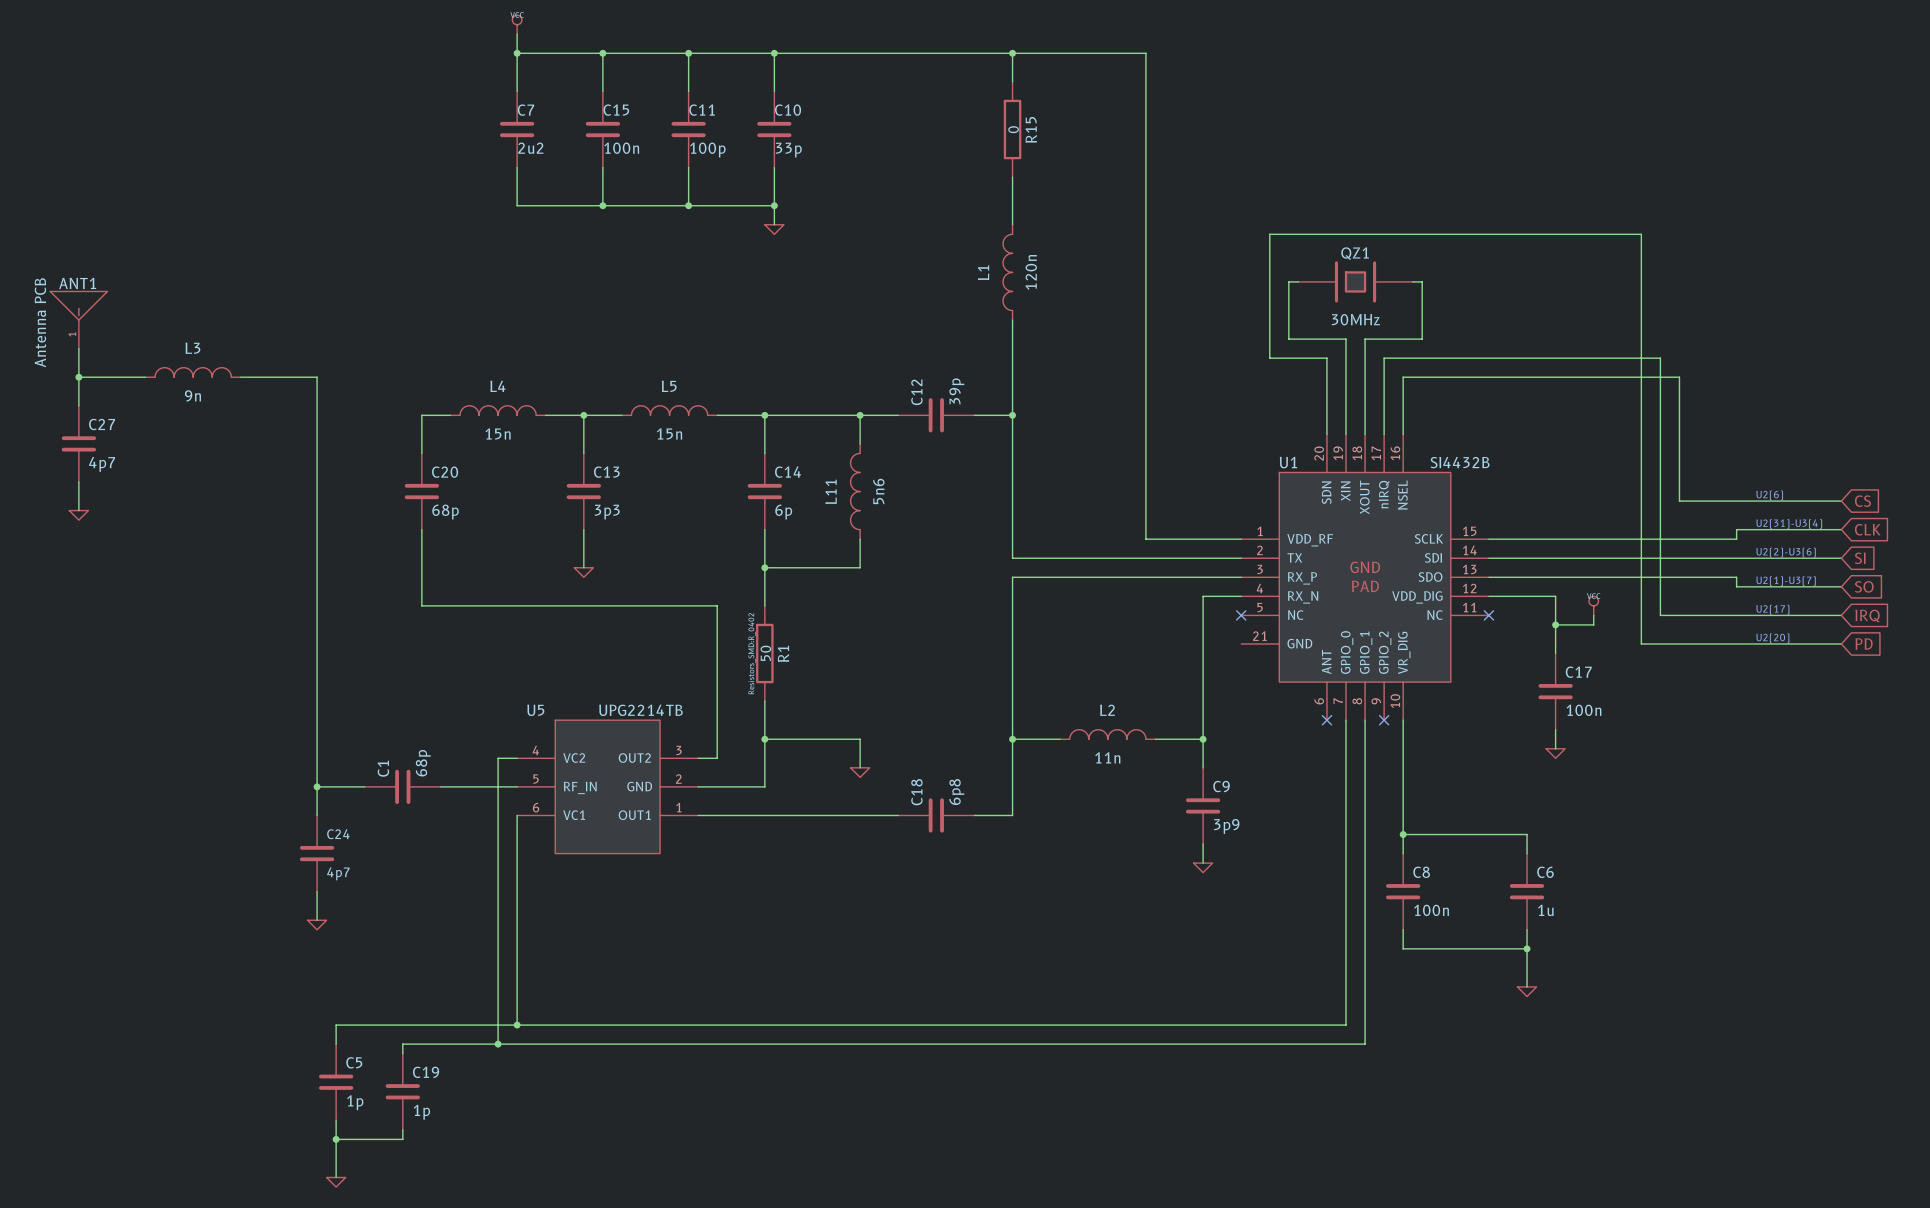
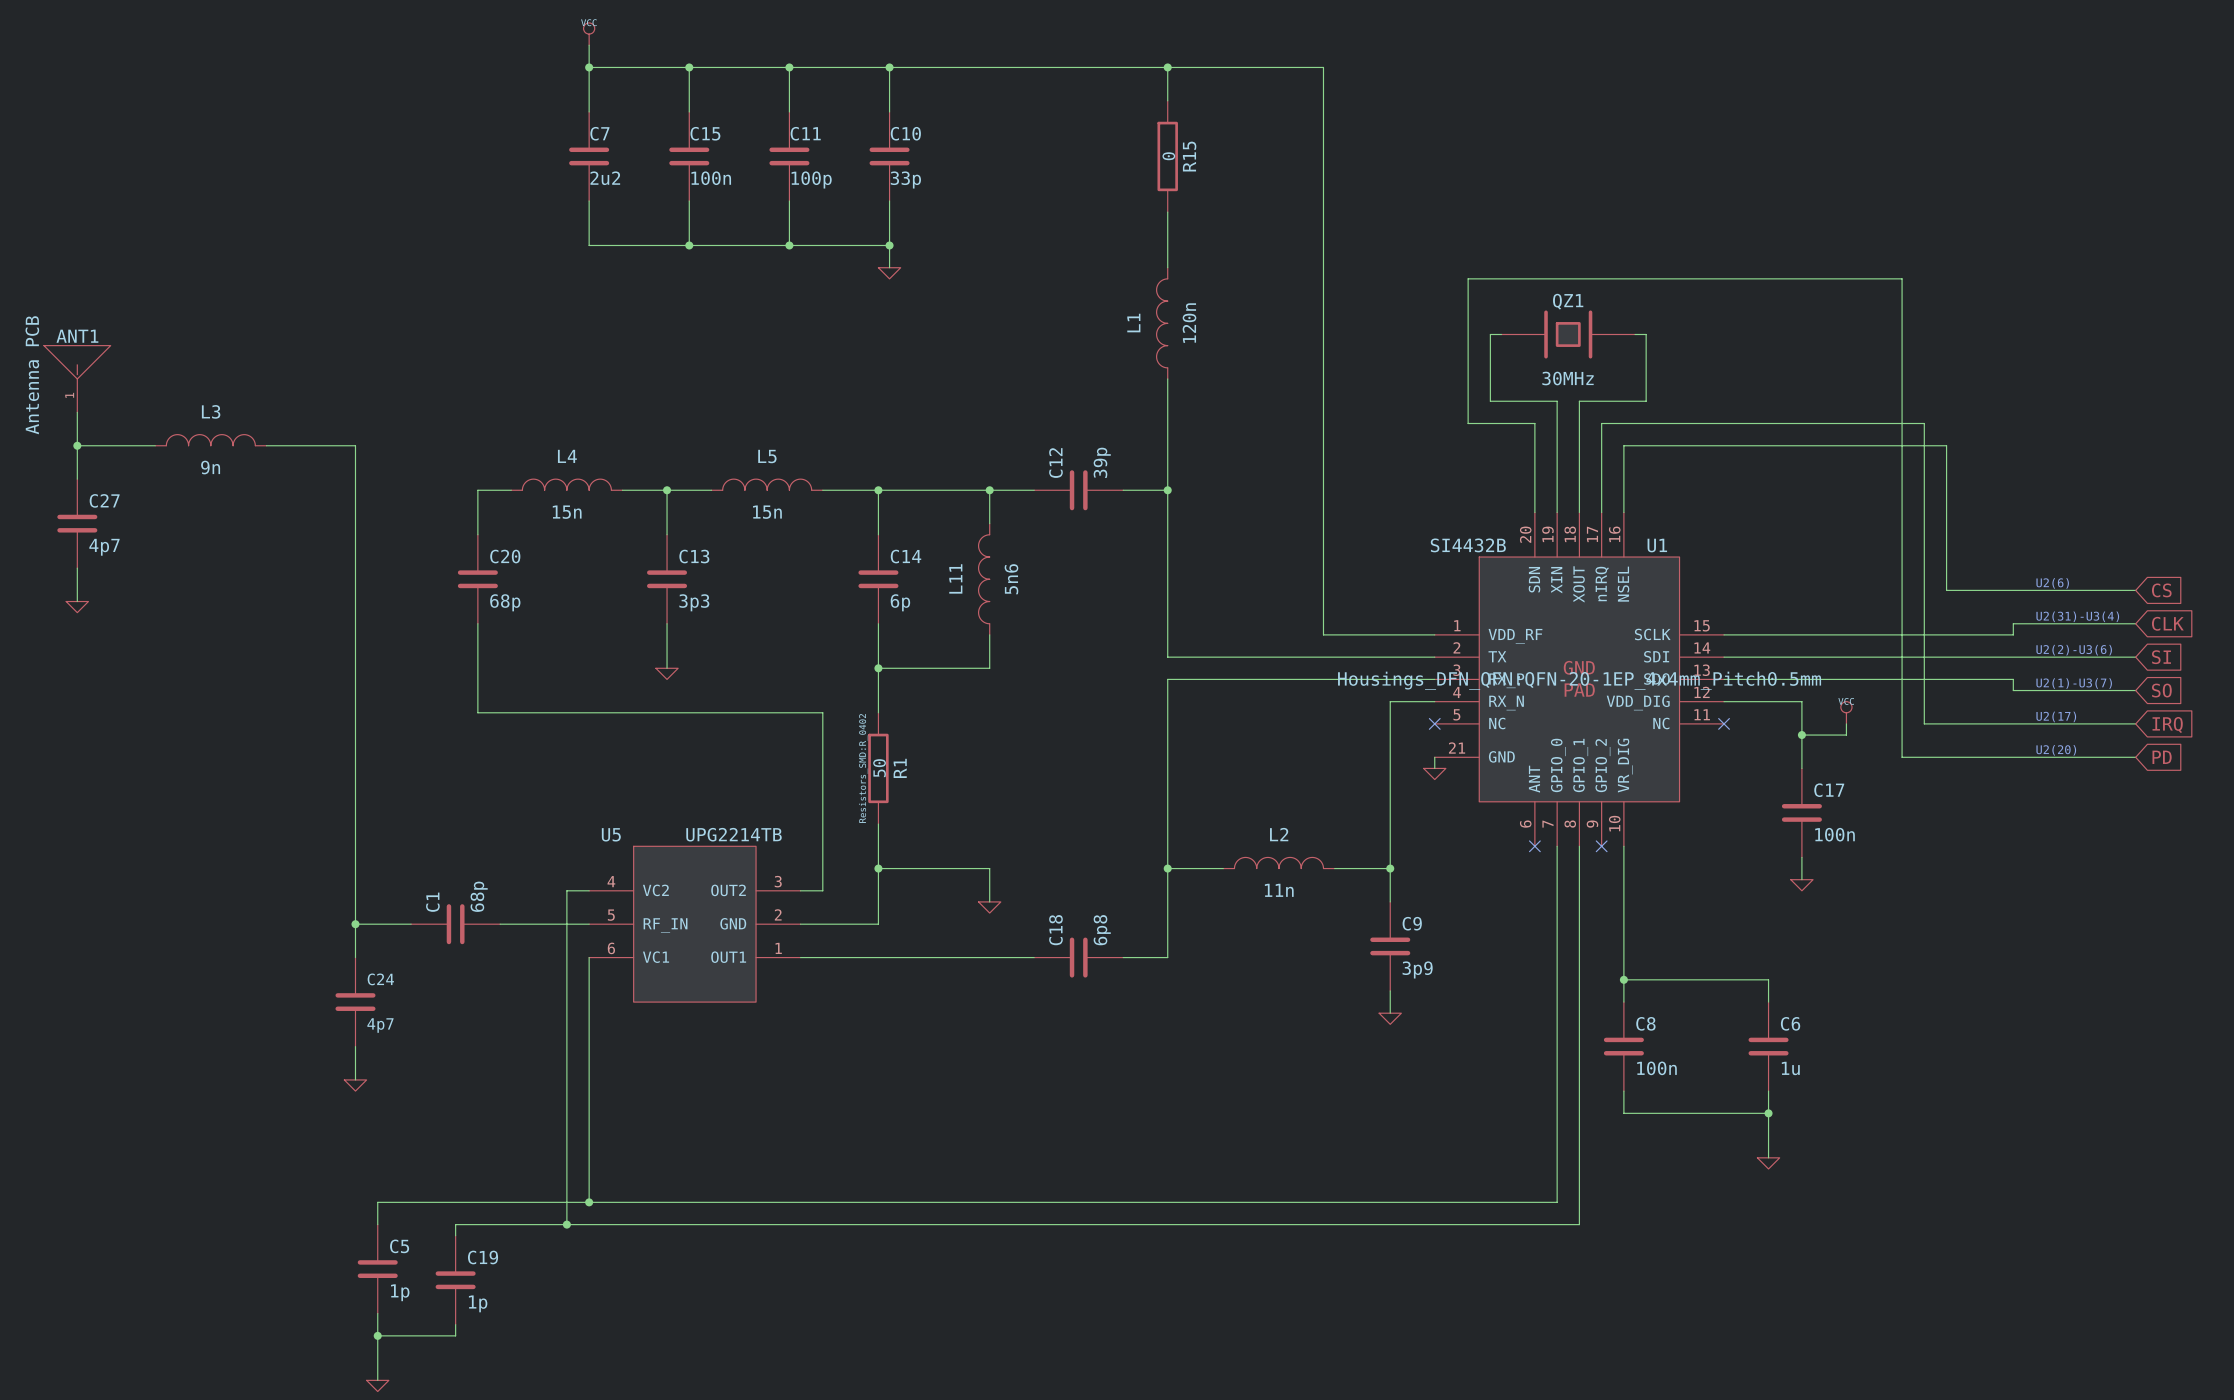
U1 name position: U1 (1288, 462) -> U1 (1657, 545)
U1 value position: SI4432B (1460, 462) -> SI4432B (1468, 545)
U1 text: none -> Housings_DFN_QFN:QFN-20-1EP_4x4mm_Pitch0.5mm (1579, 680)
wire: none -> (1434, 757) (1434, 768)
power symbol: none -> (1434, 773)

